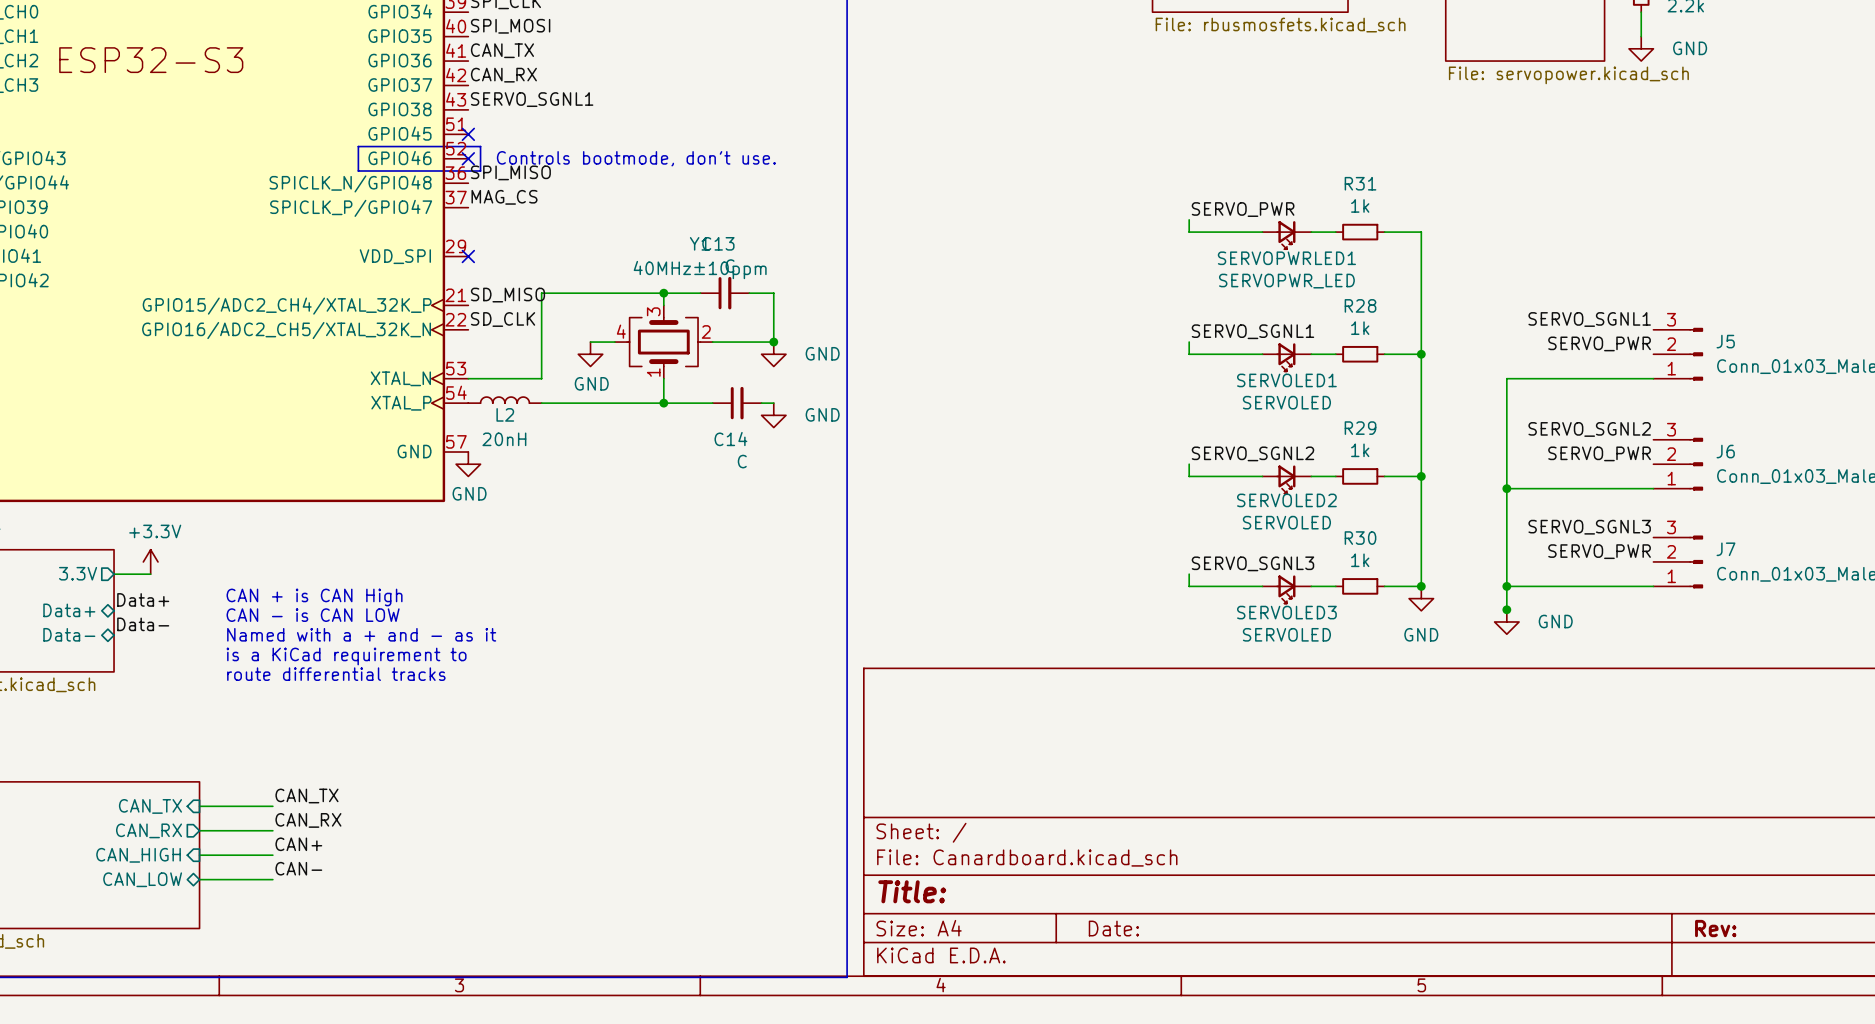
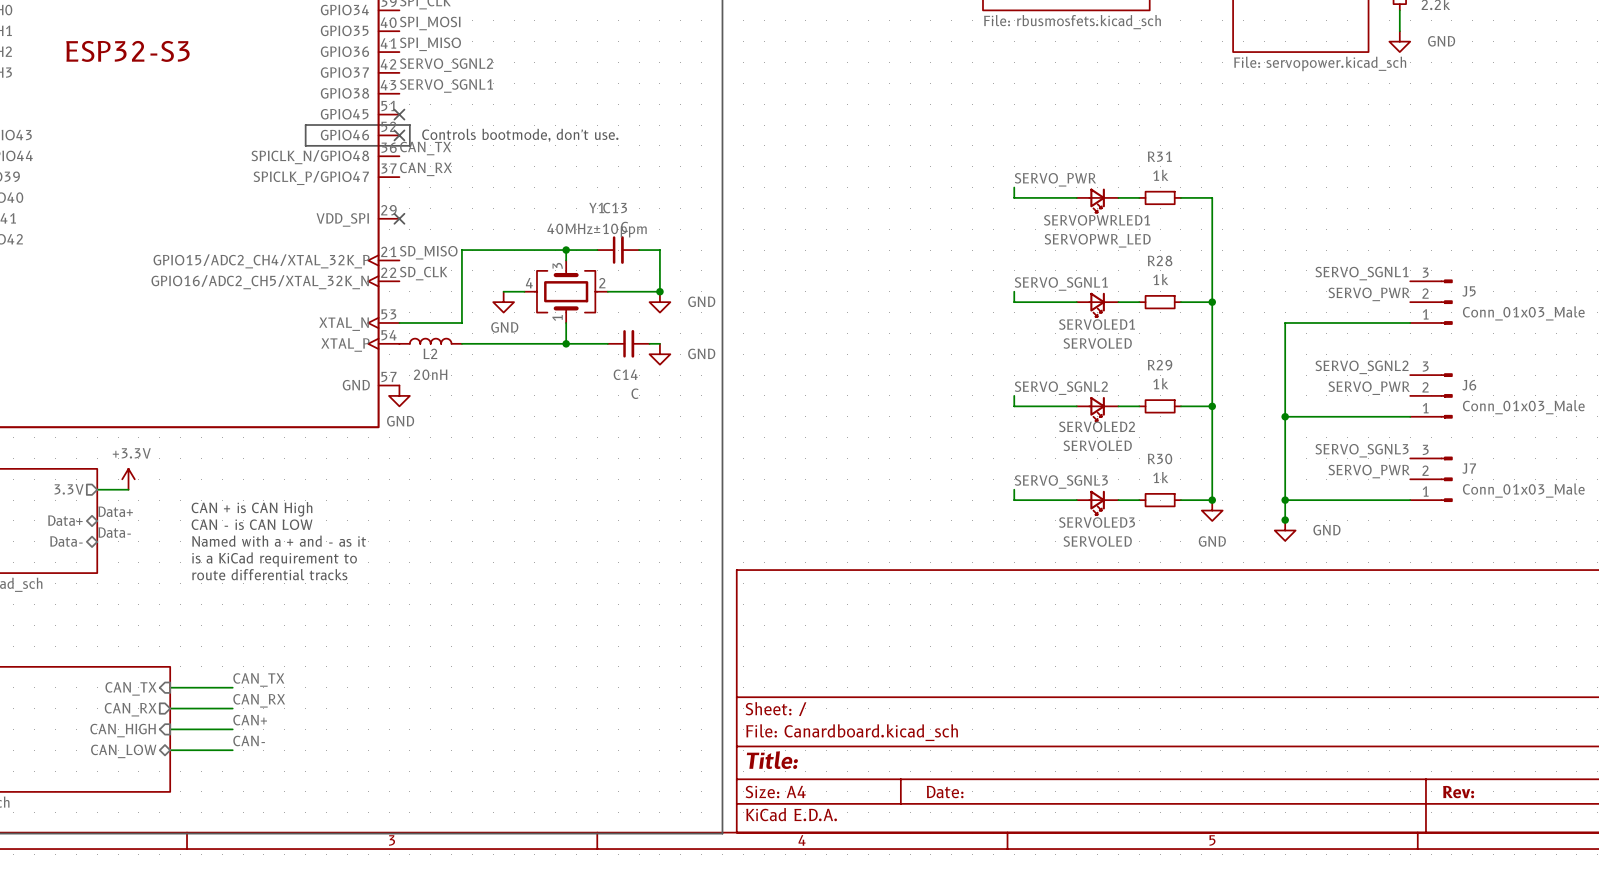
label: CAN_TX (502, 50) -> SPI_MISO (430, 44)
label: CAN_RX (503, 75) -> SERVO_SGNL2 (446, 65)
label: SPI_MISO (510, 172) -> CAN_TX (425, 148)
label: MAG_CS (504, 197) -> CAN_RX (425, 169)

